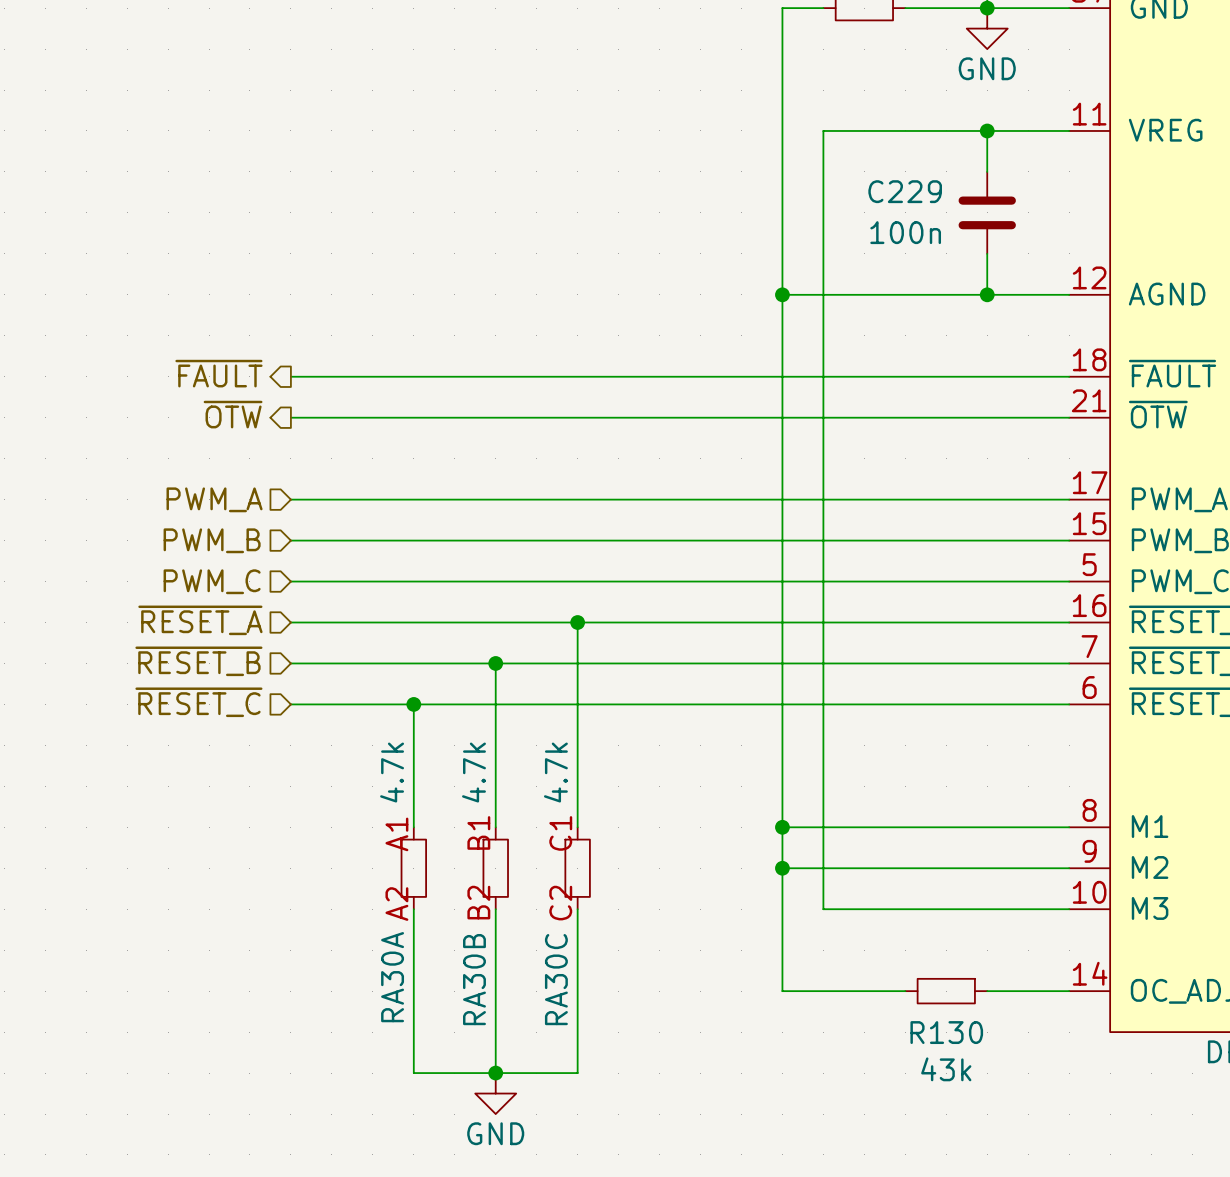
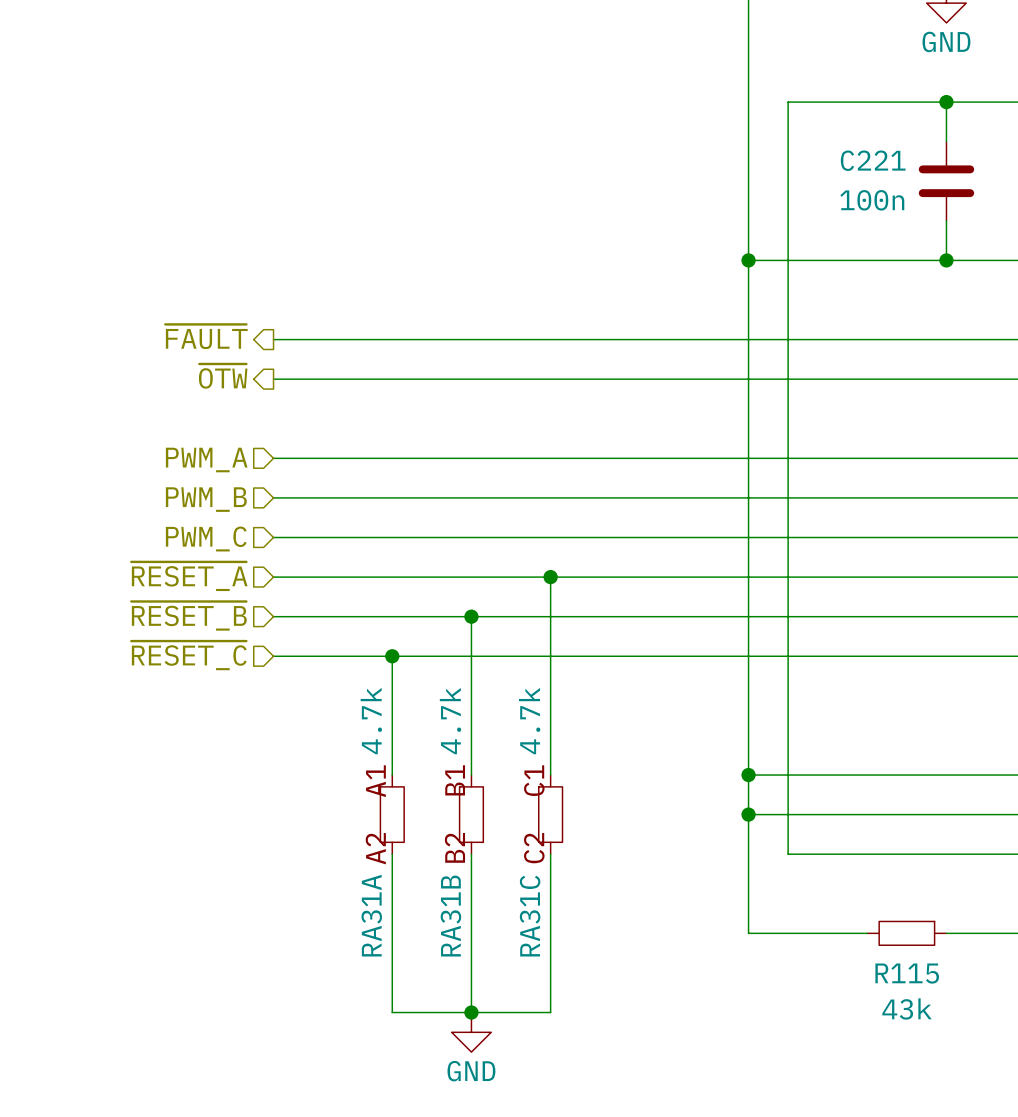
C229 name: C229 (905, 191) -> C221 (873, 160)
RA30A name: RA30A (392, 977) -> RA31A (371, 915)
RA30B name: RA30B (474, 979) -> RA31B (450, 916)
RA30C name: RA30C (556, 979) -> RA31C (530, 916)
R130 name: R130 (946, 1032) -> R115 (907, 973)

